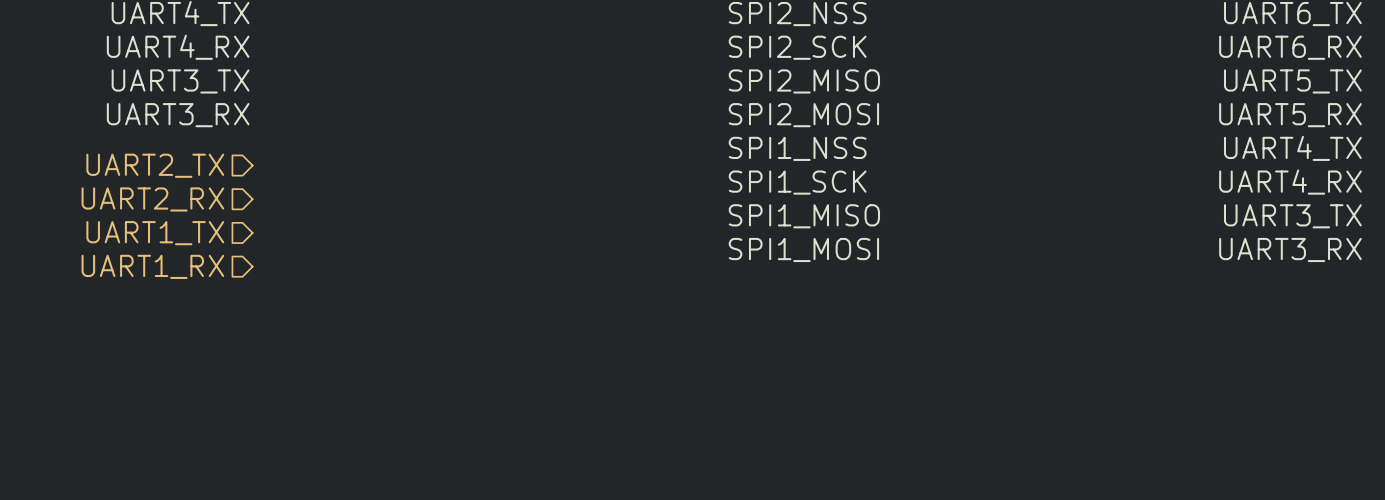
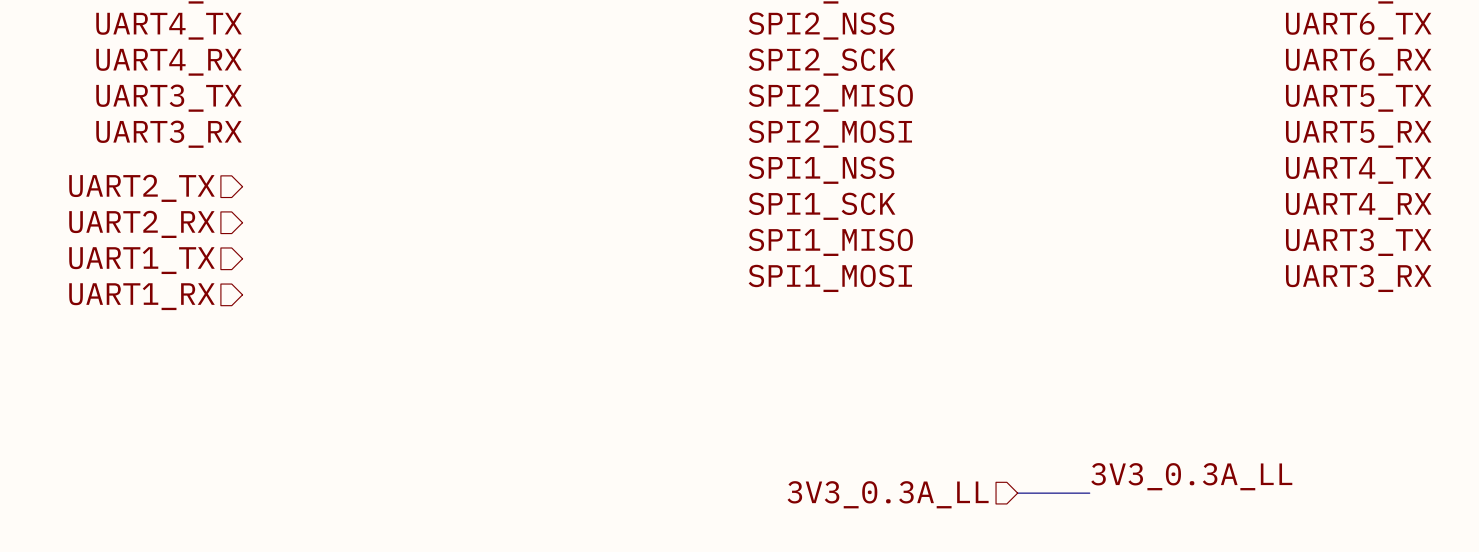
label: none -> 3V3_0.3A_LL (1191, 476)
hierarchical label: none -> 3V3_0.3A_LL (888, 494)
wire: none -> (1017, 493) (1089, 493)

